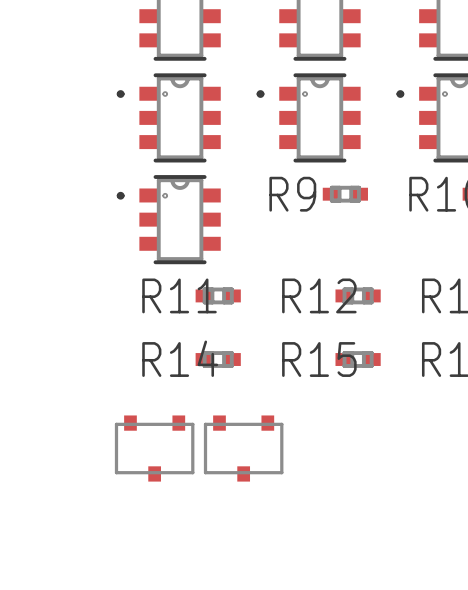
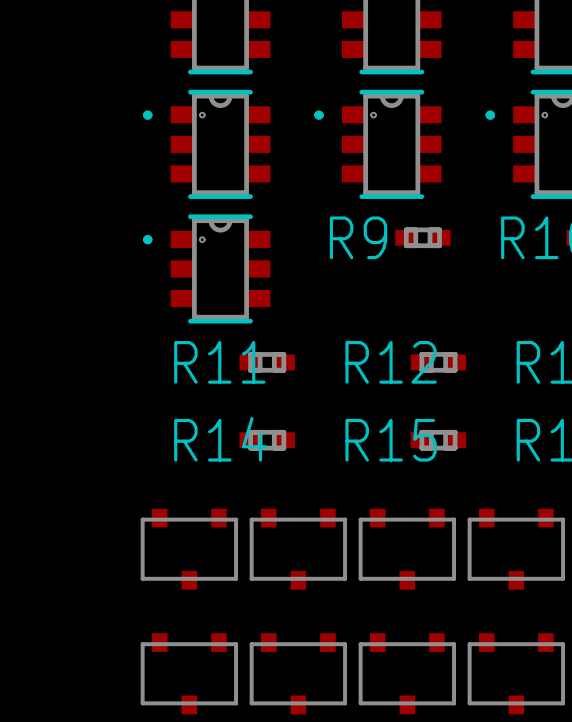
part: none -> (407, 549)
part: none -> (516, 549)
part: none -> (189, 673)
part: none -> (298, 673)
part: none -> (407, 673)
part: none -> (516, 673)

